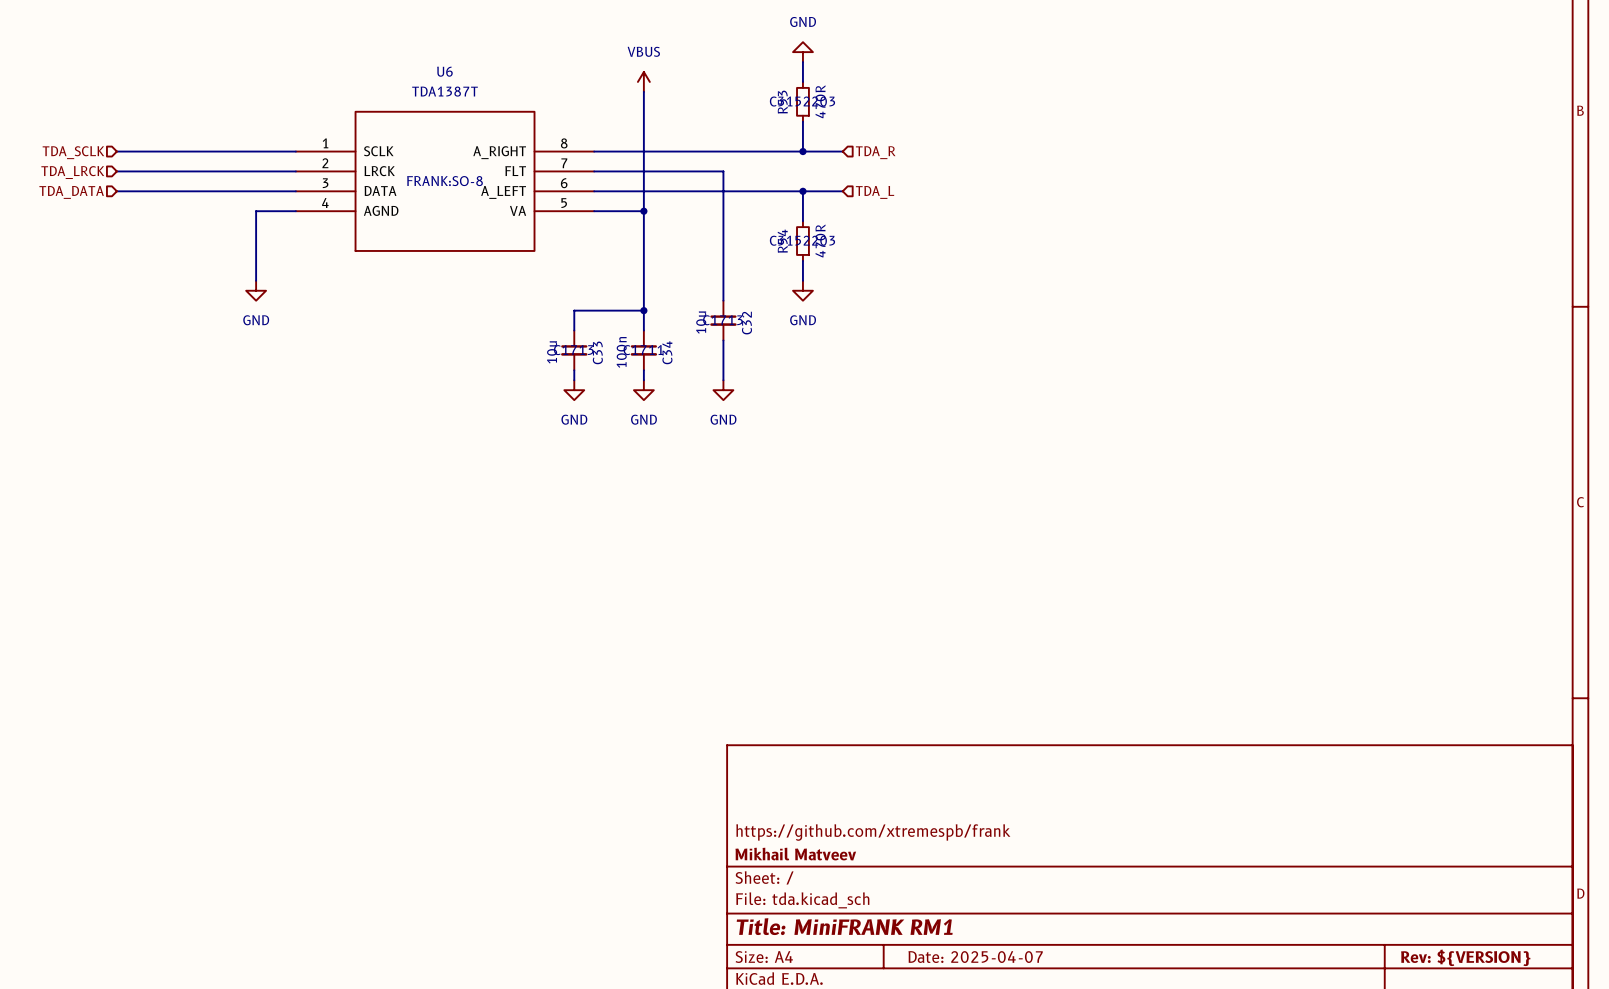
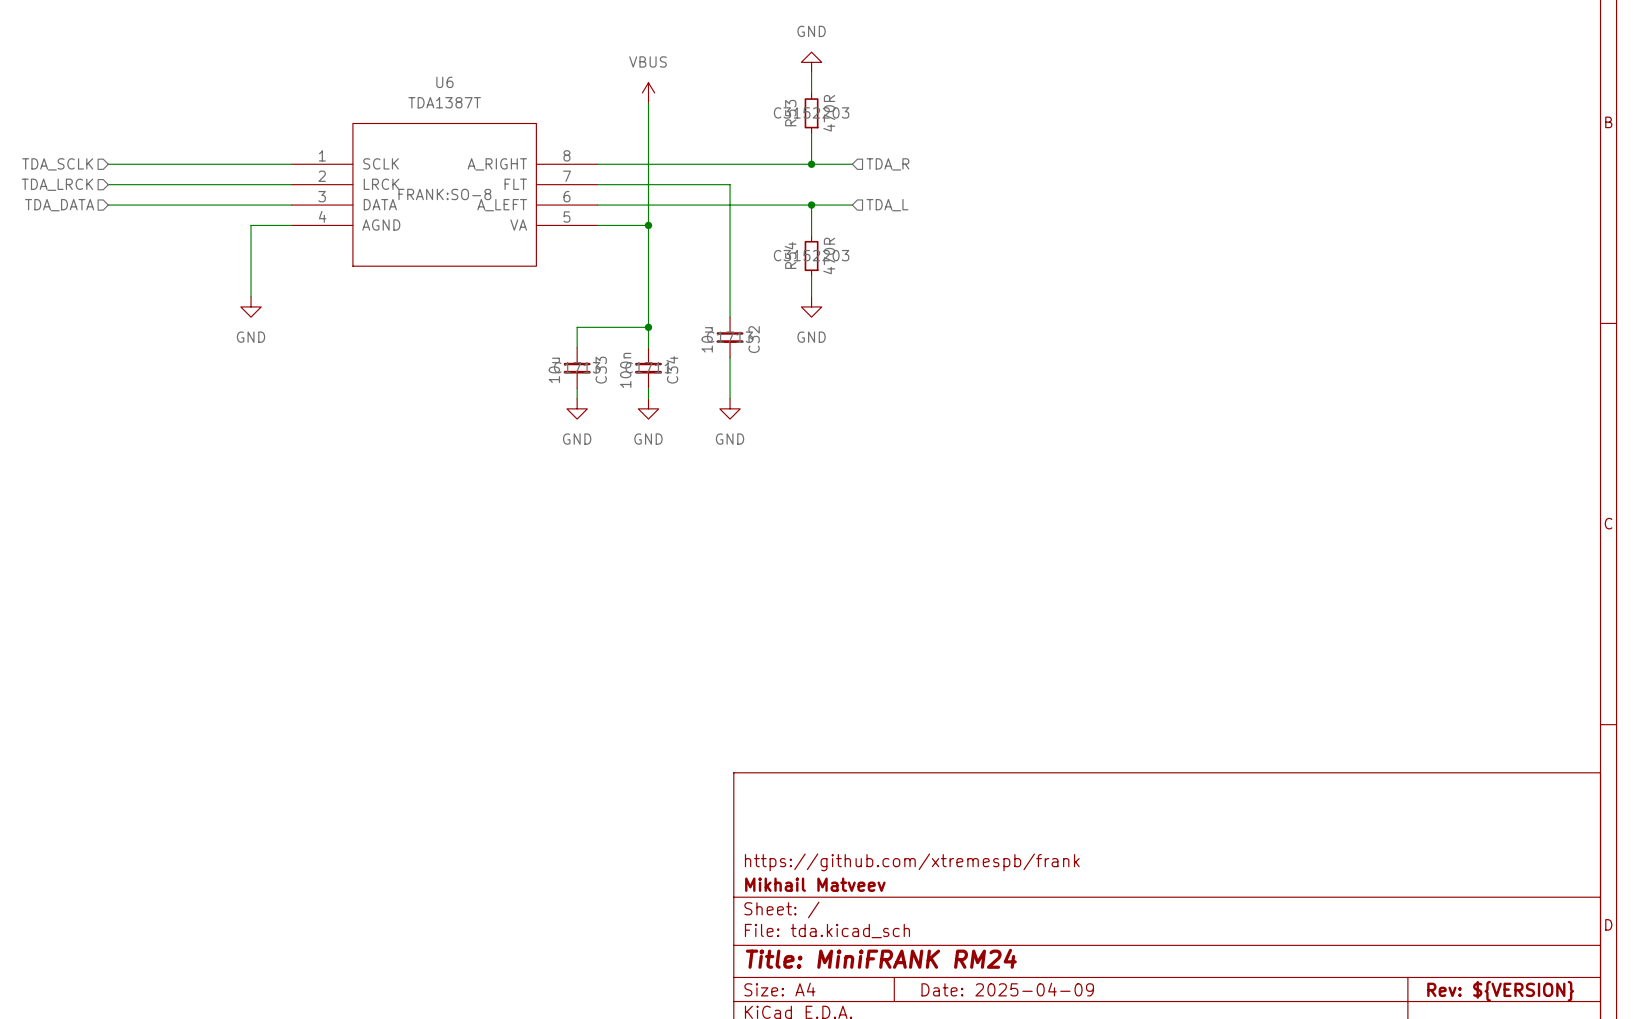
title block: Title: MiniFRANK RM1 (844, 926) -> Title: MiniFRANK RM24 (881, 958)
title block: Date: 2025-04-07 (975, 957) -> Date: 2025-04-09 (1007, 989)

